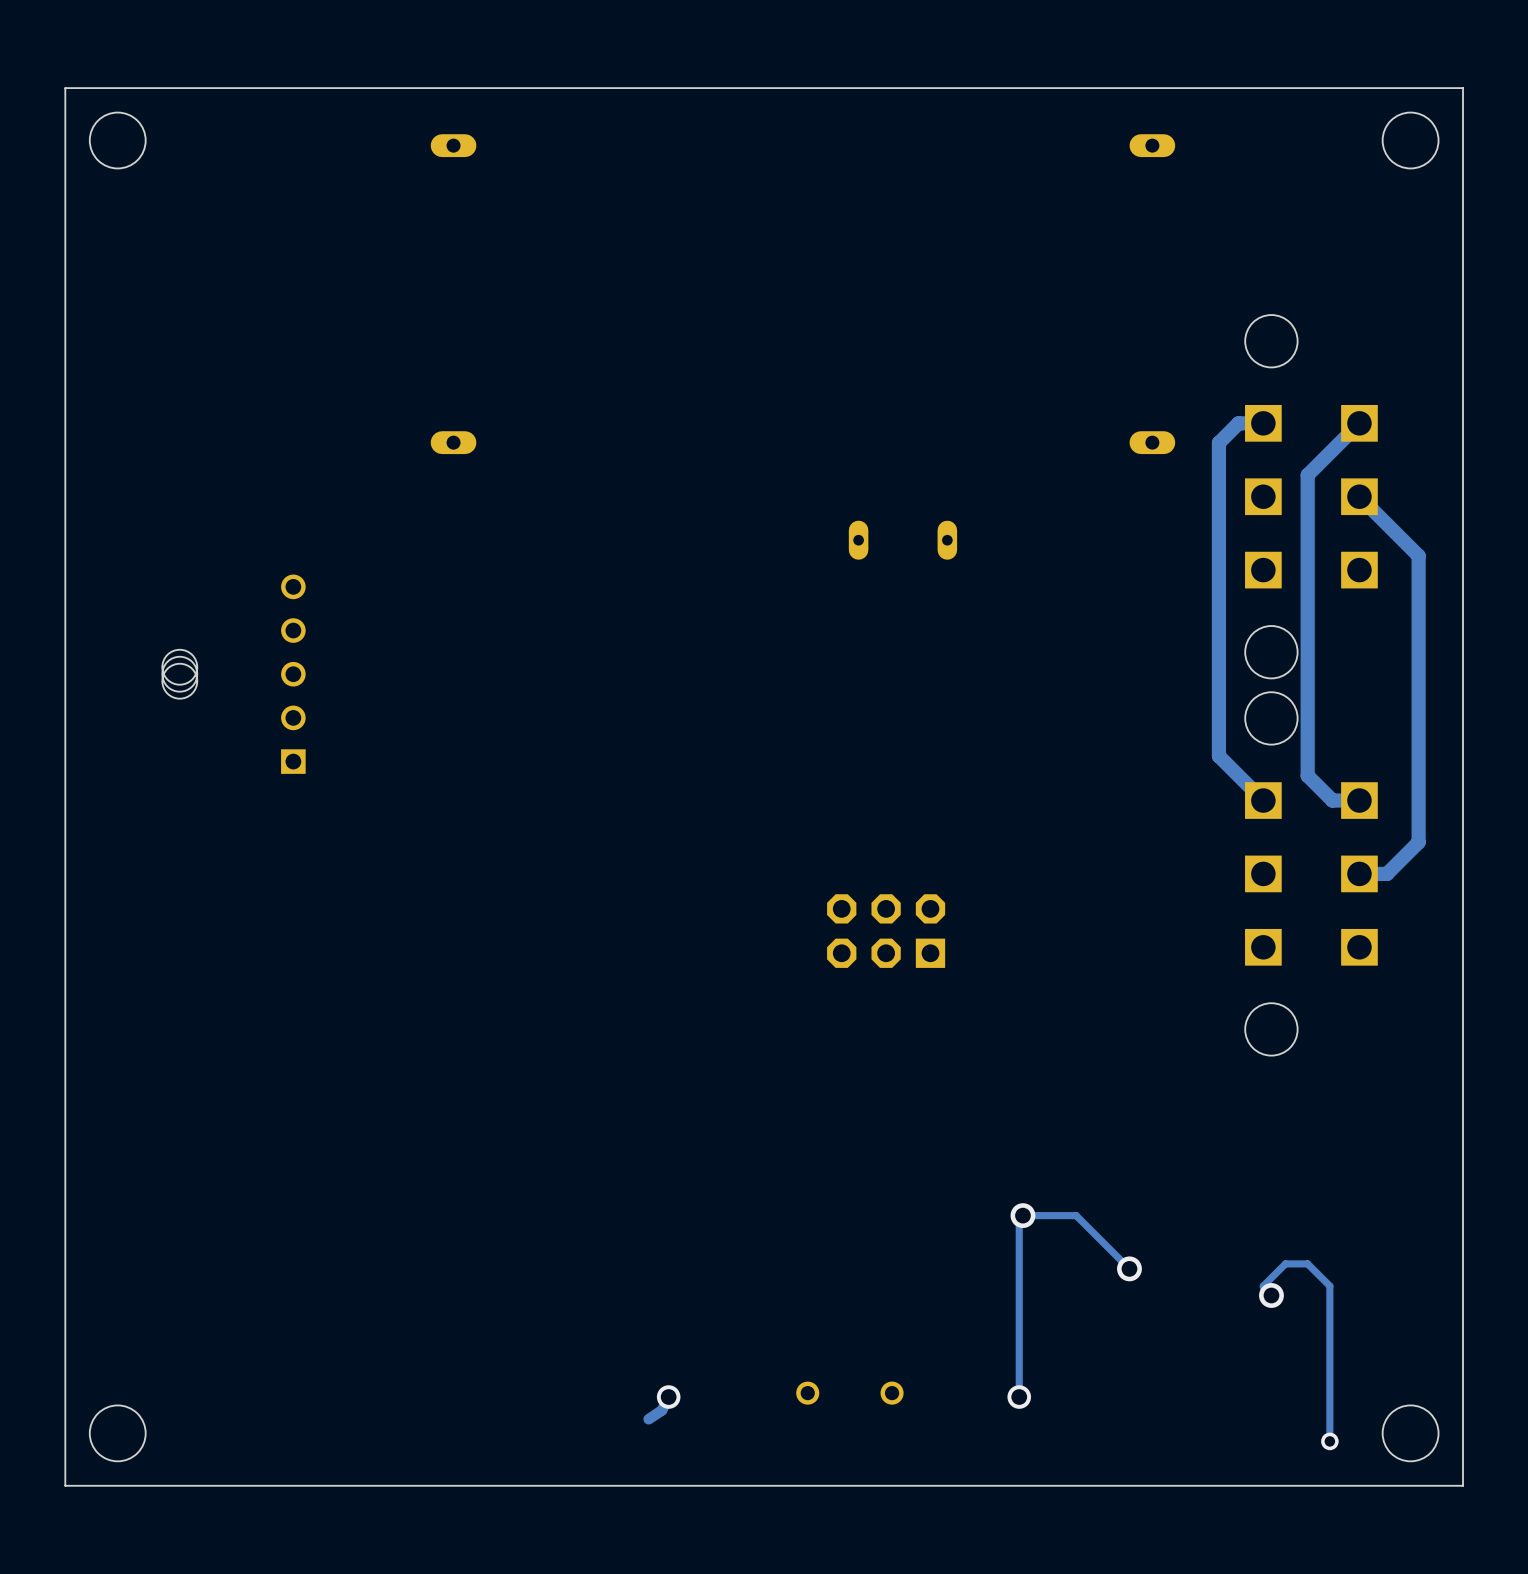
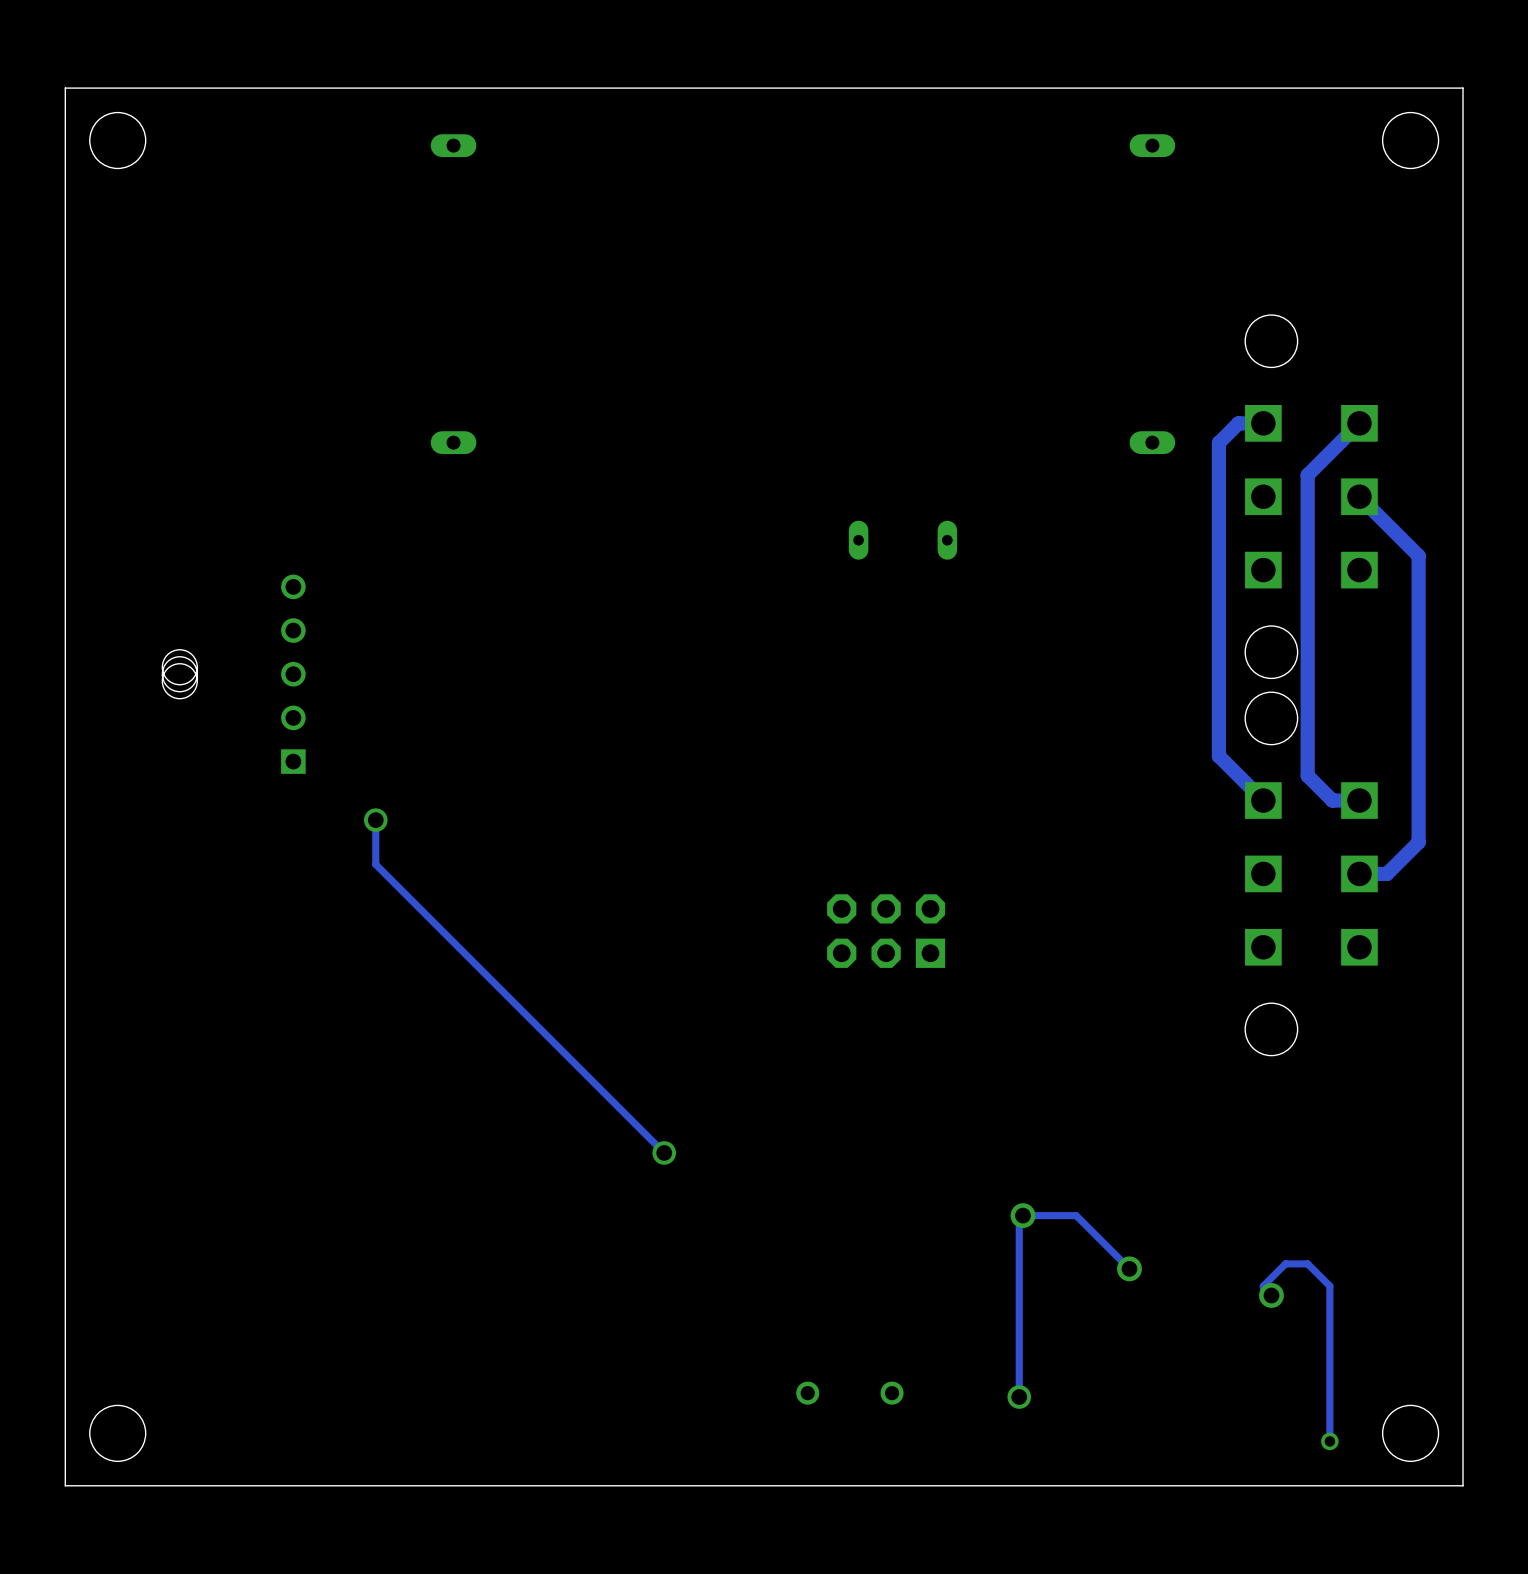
track: none -> (375, 820) (375, 864) (664, 1152)
via: none -> (375, 820)
via: none -> (664, 1152)
track: (668, 1397) (662, 1410) (648, 1419) -> none
via: (668, 1397) -> none

